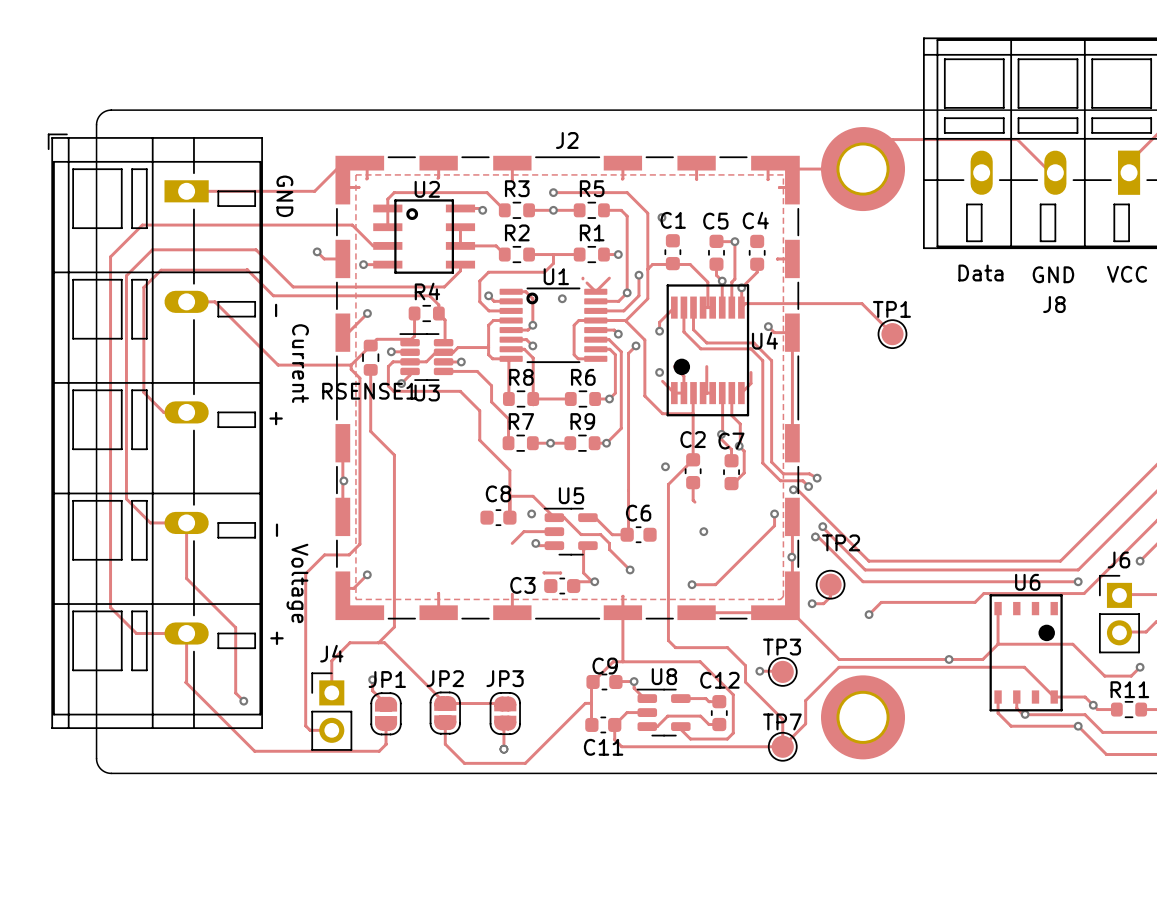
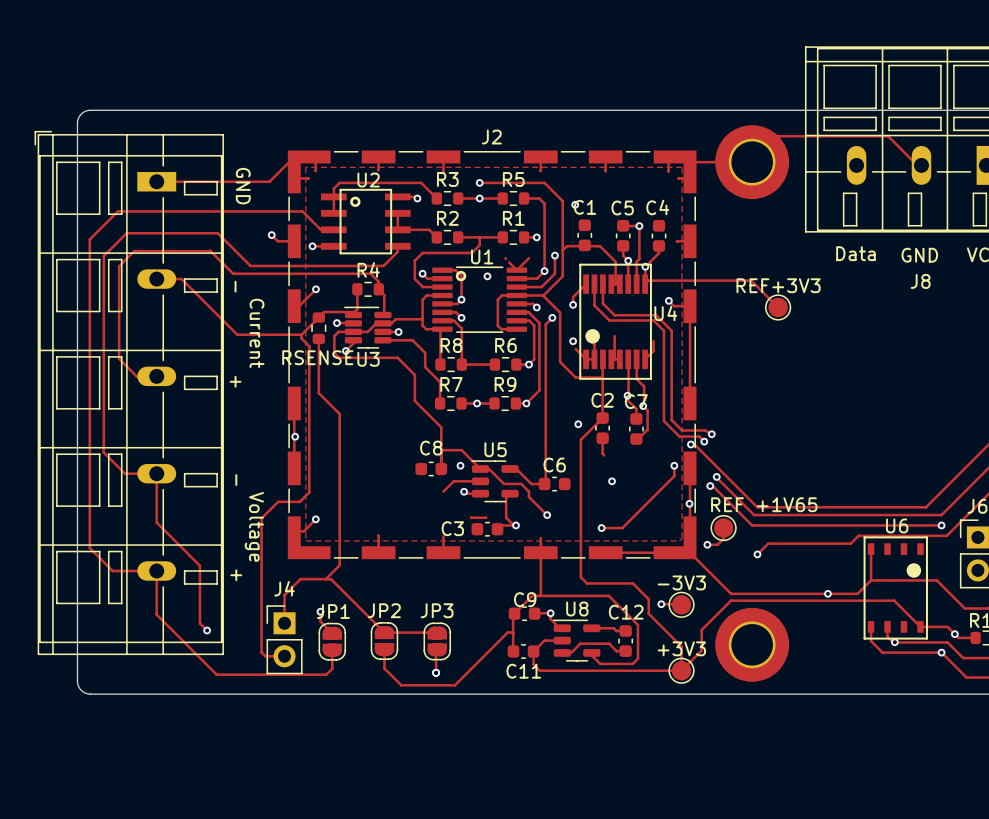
TP1 name: TP1 (891, 309) -> REF+3V3 (778, 285)
RSENSE1 name: RSENSE1 (369, 391) -> RSENSE (317, 357)
TP2 name: TP2 (841, 542) -> REF +1V65 (764, 504)
TP3 name: TP3 (782, 647) -> -3V3 (681, 582)
TP7 name: TP7 (782, 721) -> +3V3 (681, 648)

